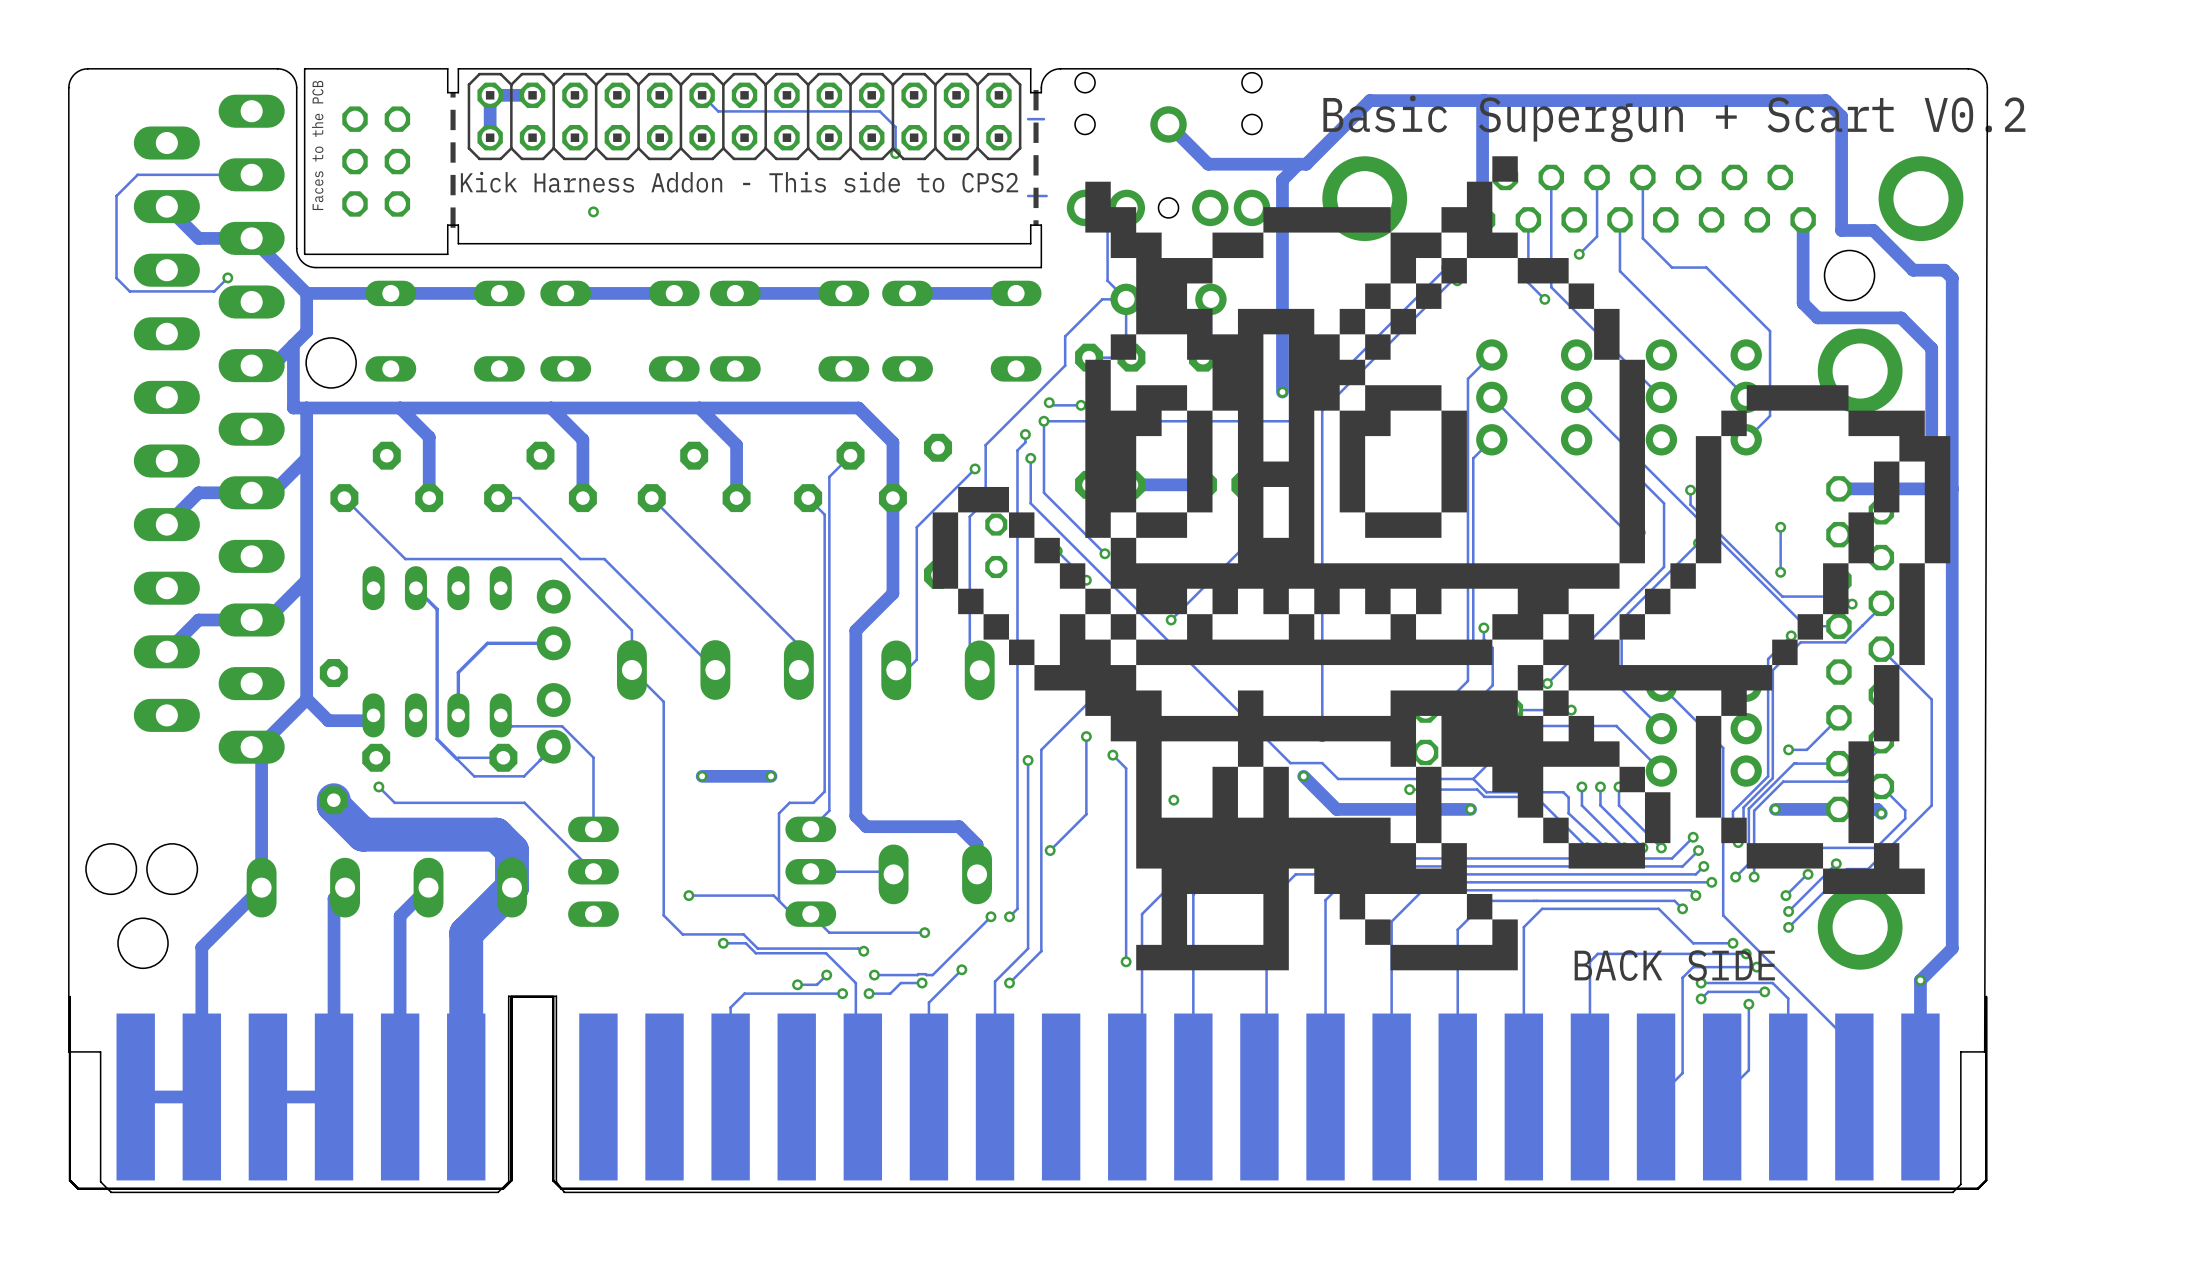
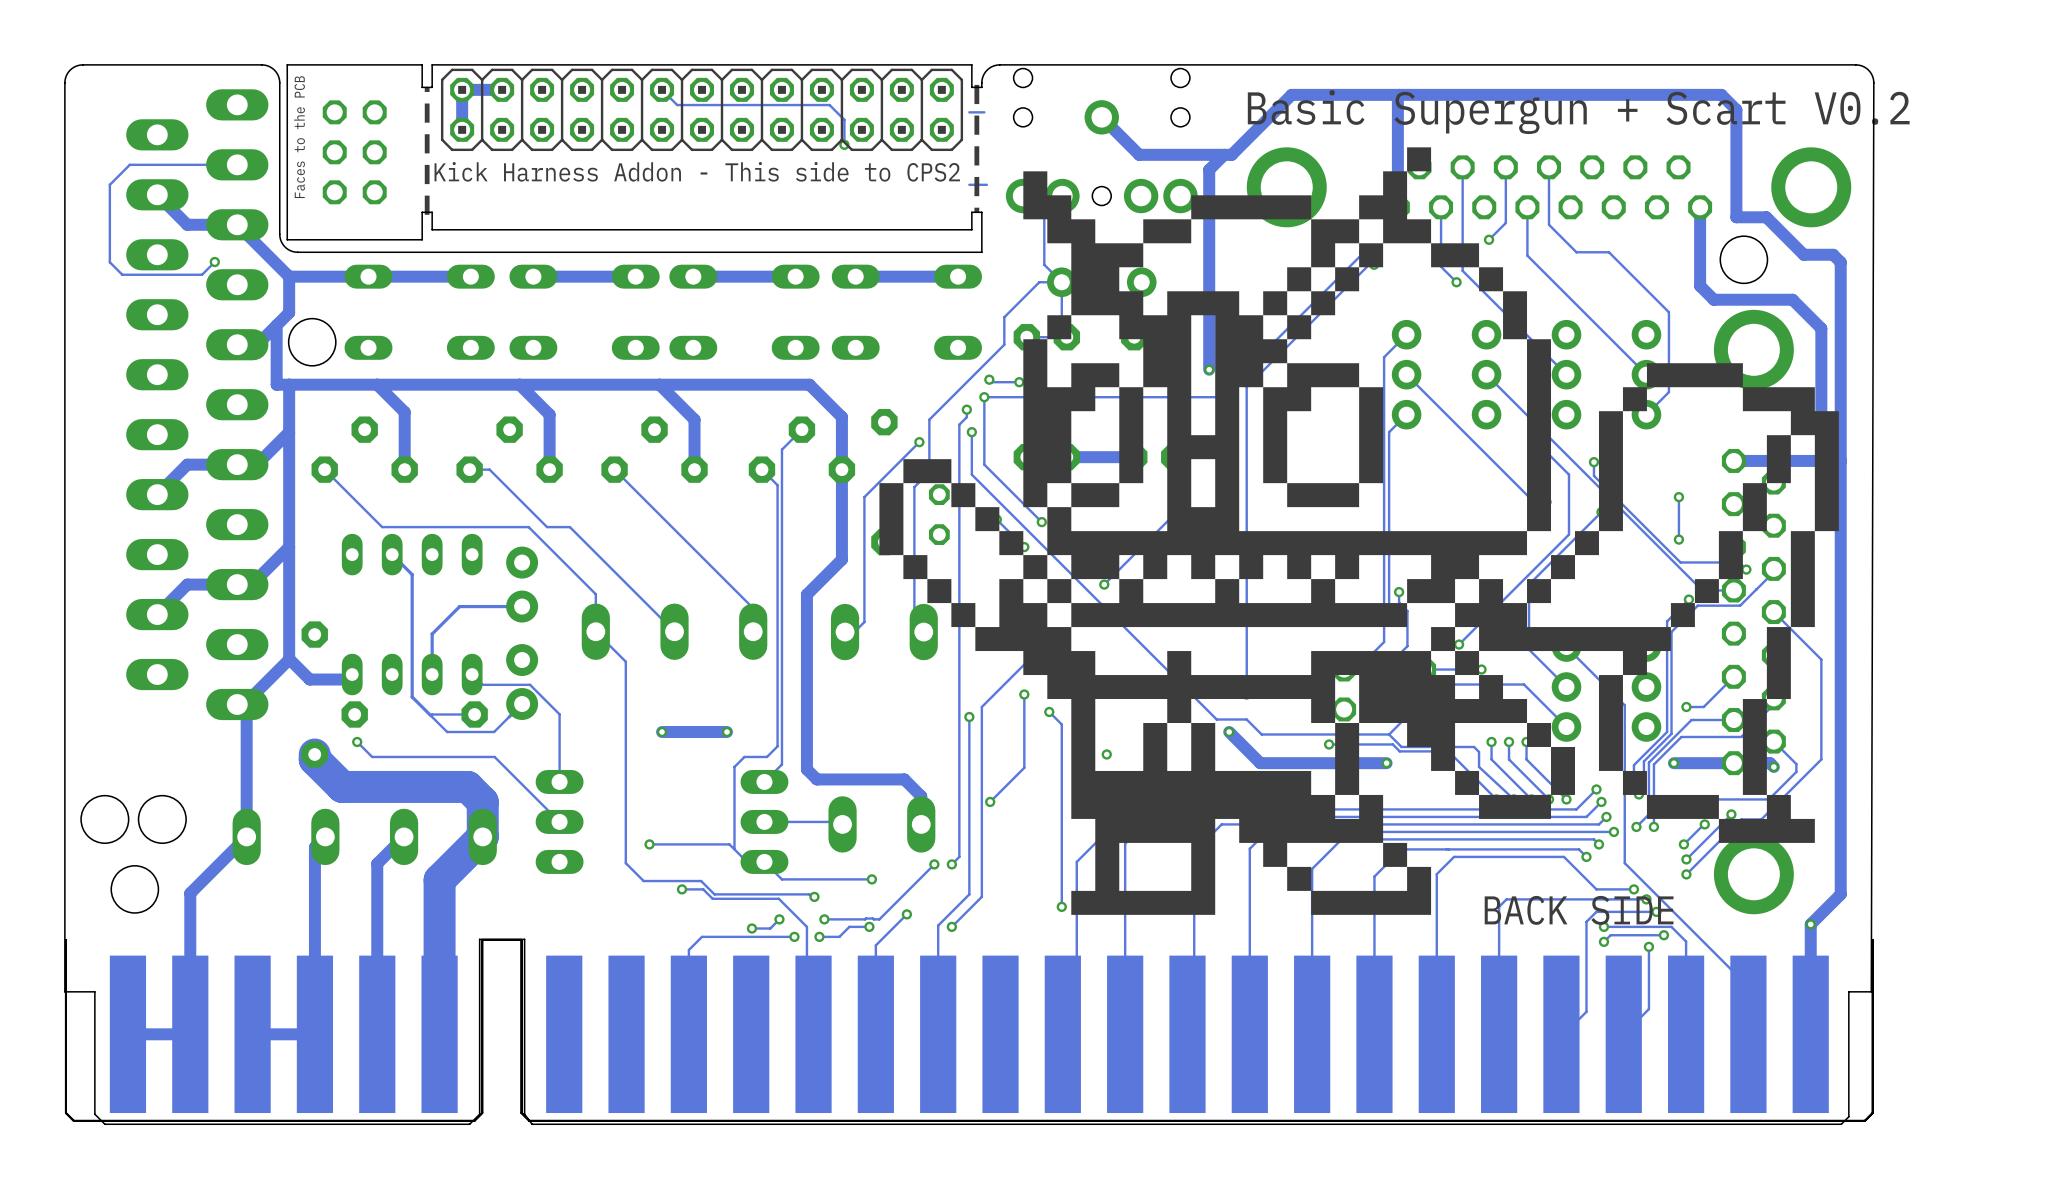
via: (593, 211) -> none

